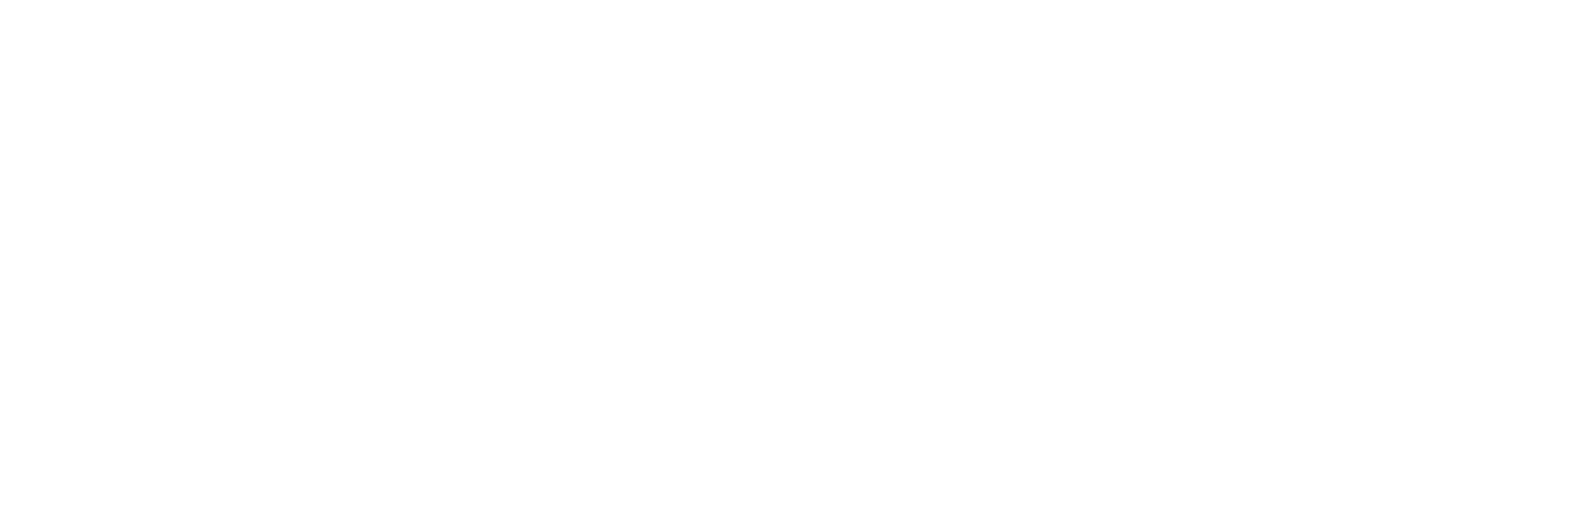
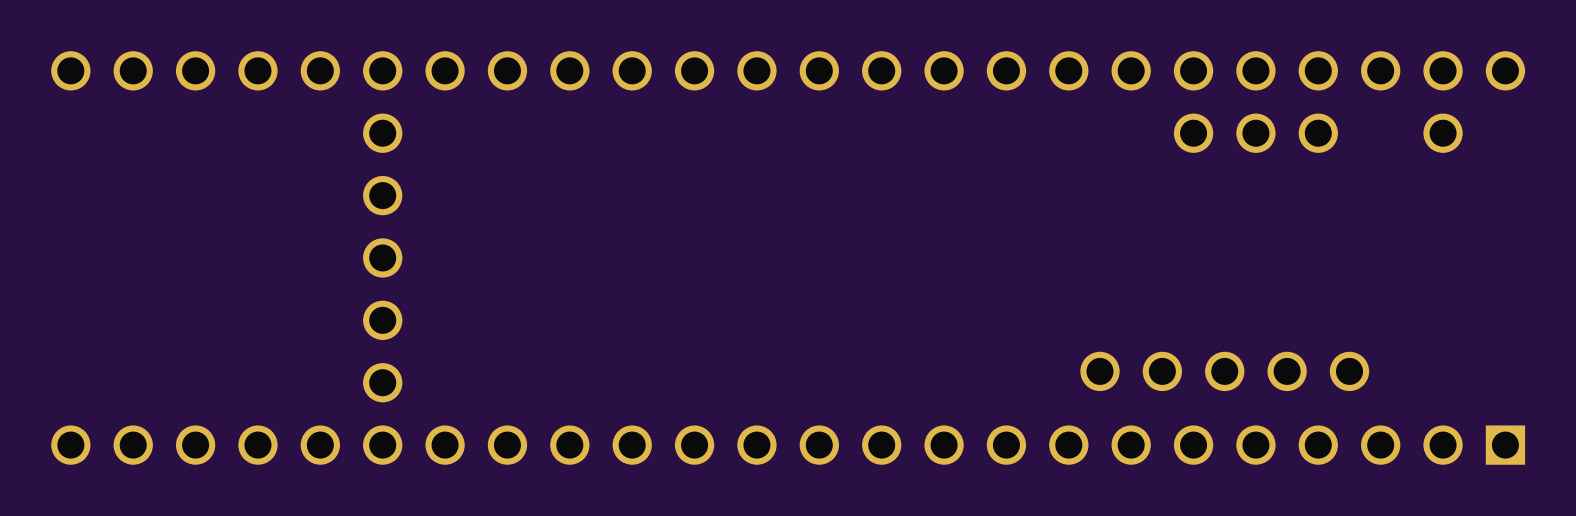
part: none -> (788, 257)

